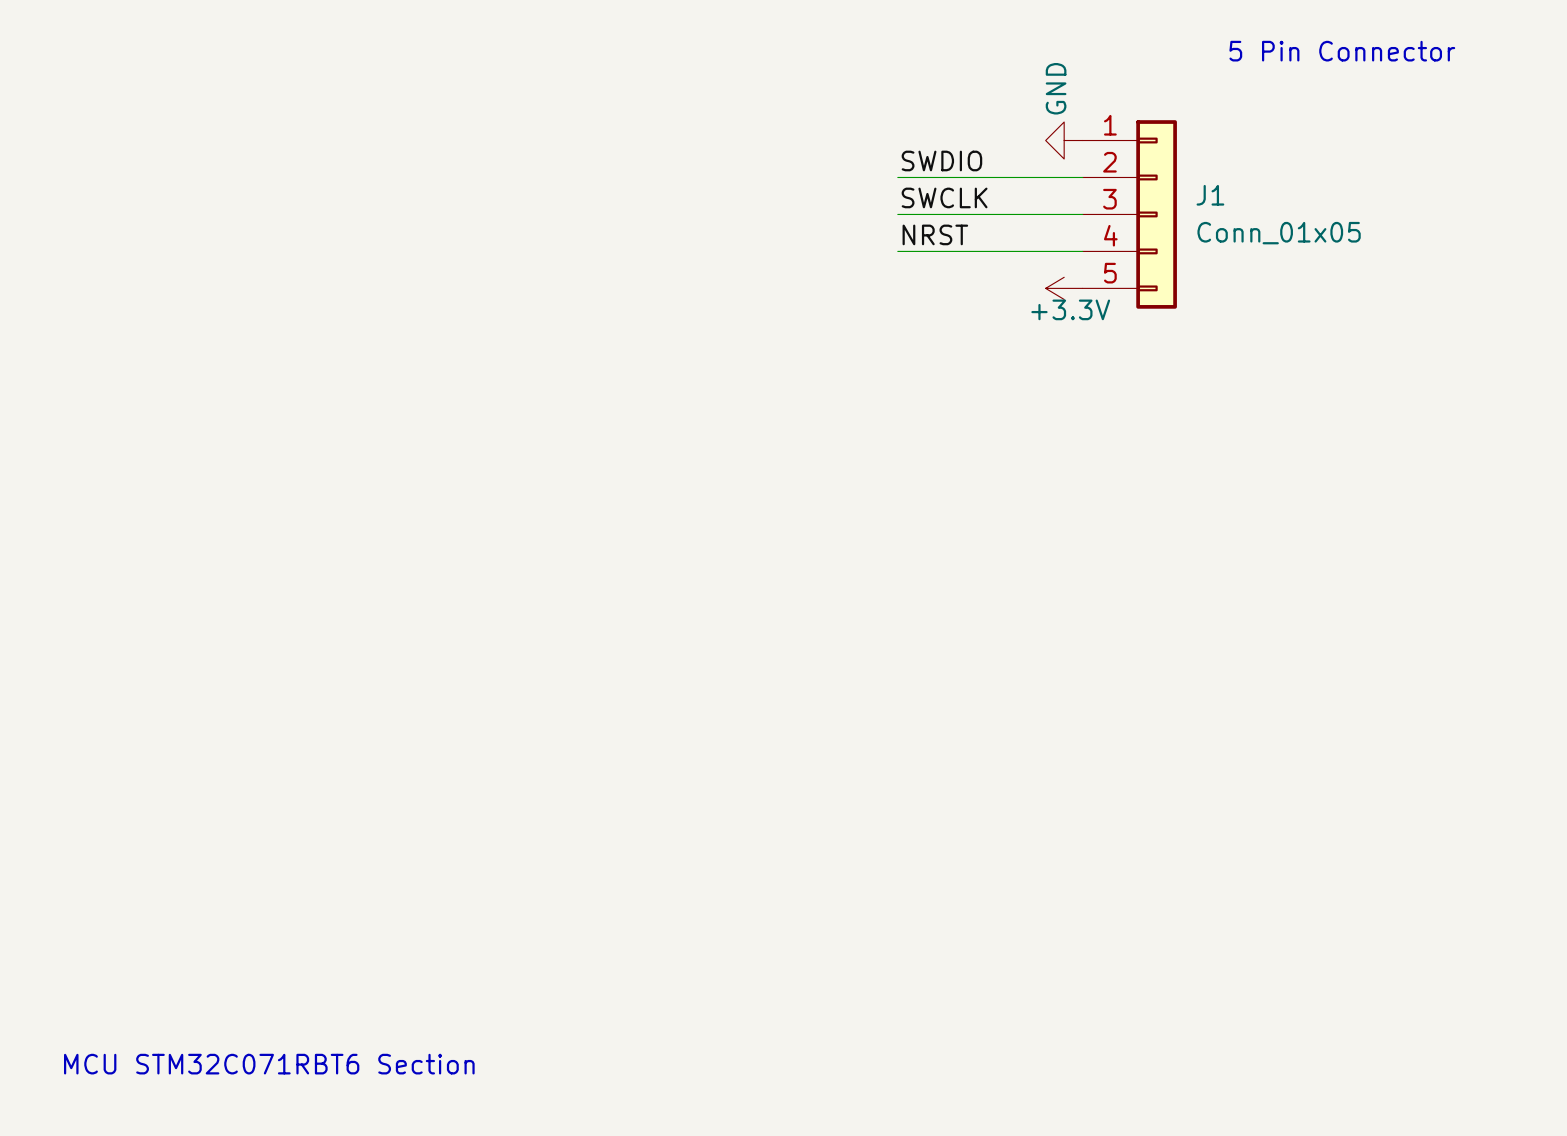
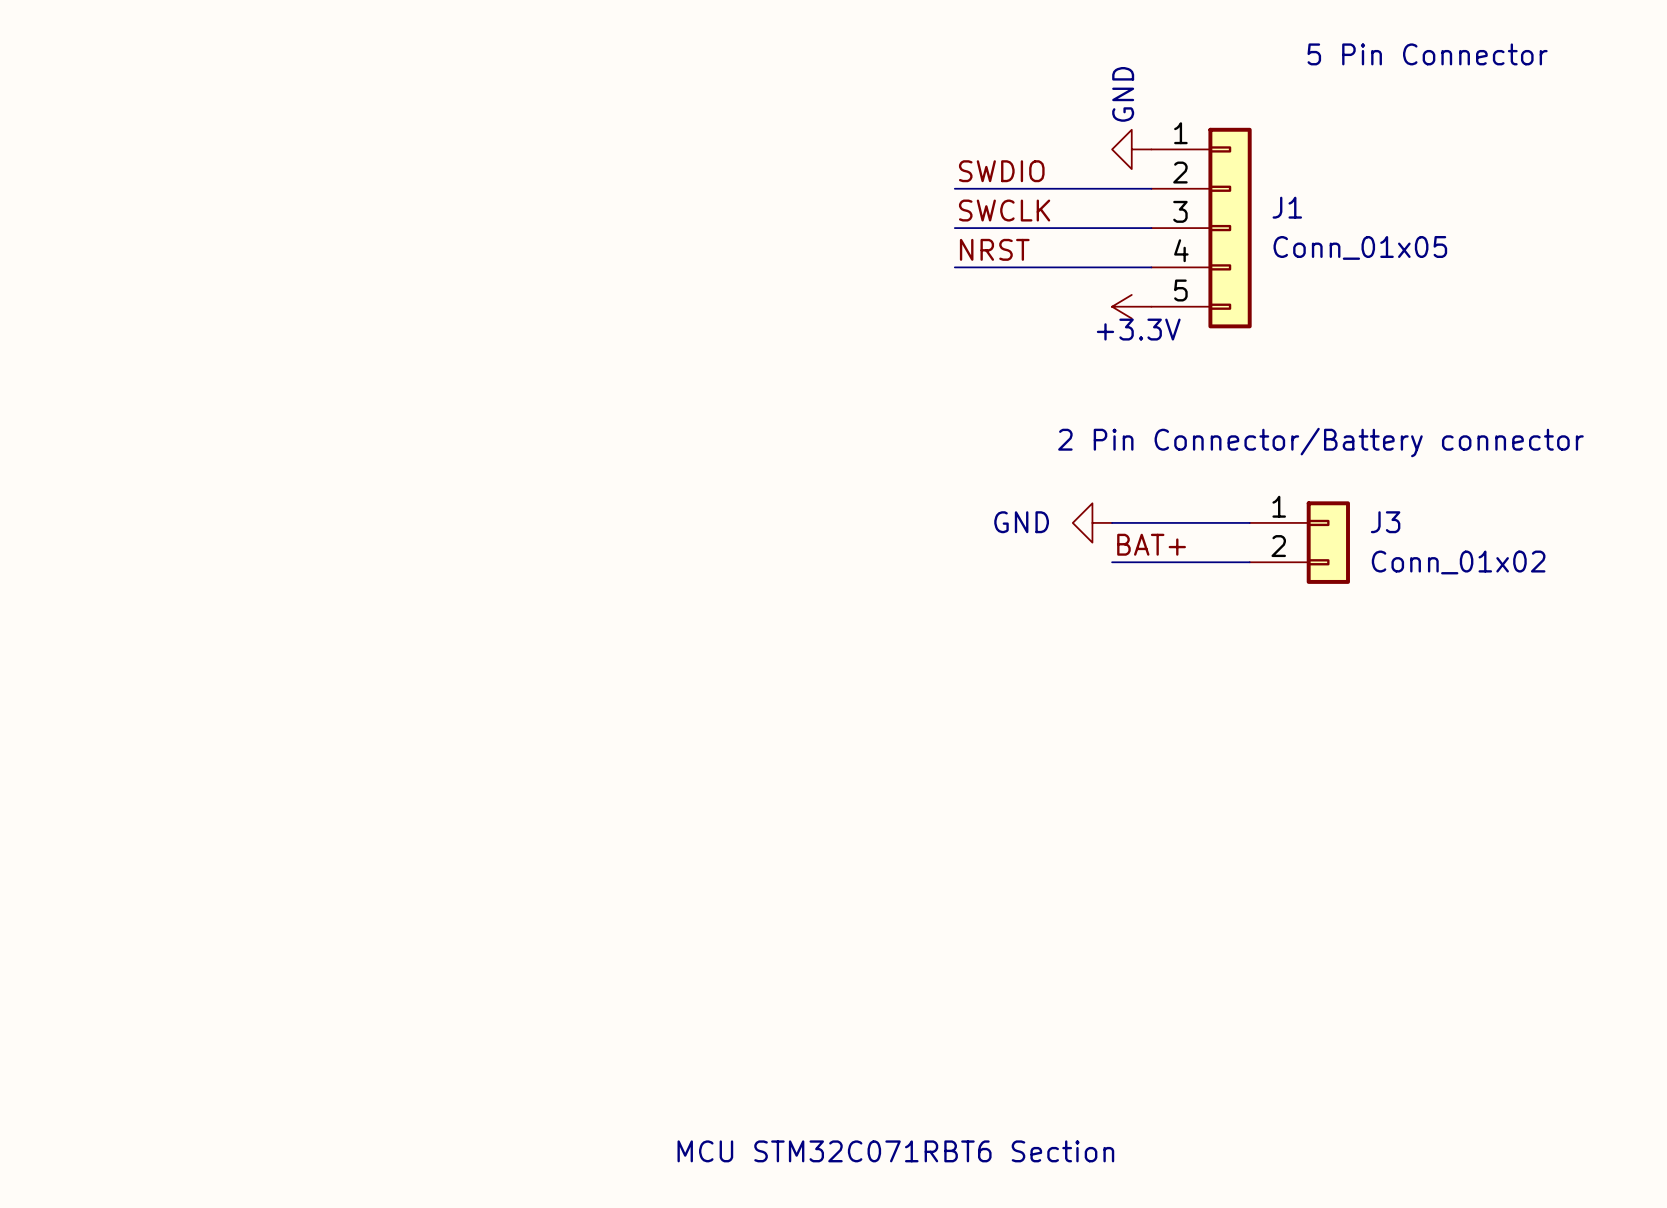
text: none -> 2 Pin Connector/Battery connector (1320, 442)
power symbol: none -> GND (1092, 522)
wire: none -> (1112, 522) (1249, 522)
J3: none -> Conn_01x02 (1299, 542)
label: none -> BAT+ (1151, 544)
wire: none -> (1112, 562) (1249, 562)
text: MCU STM32C071RBT6 Section (269, 1064) -> none
text: none -> MCU STM32C071RBT6 Section (895, 1151)

